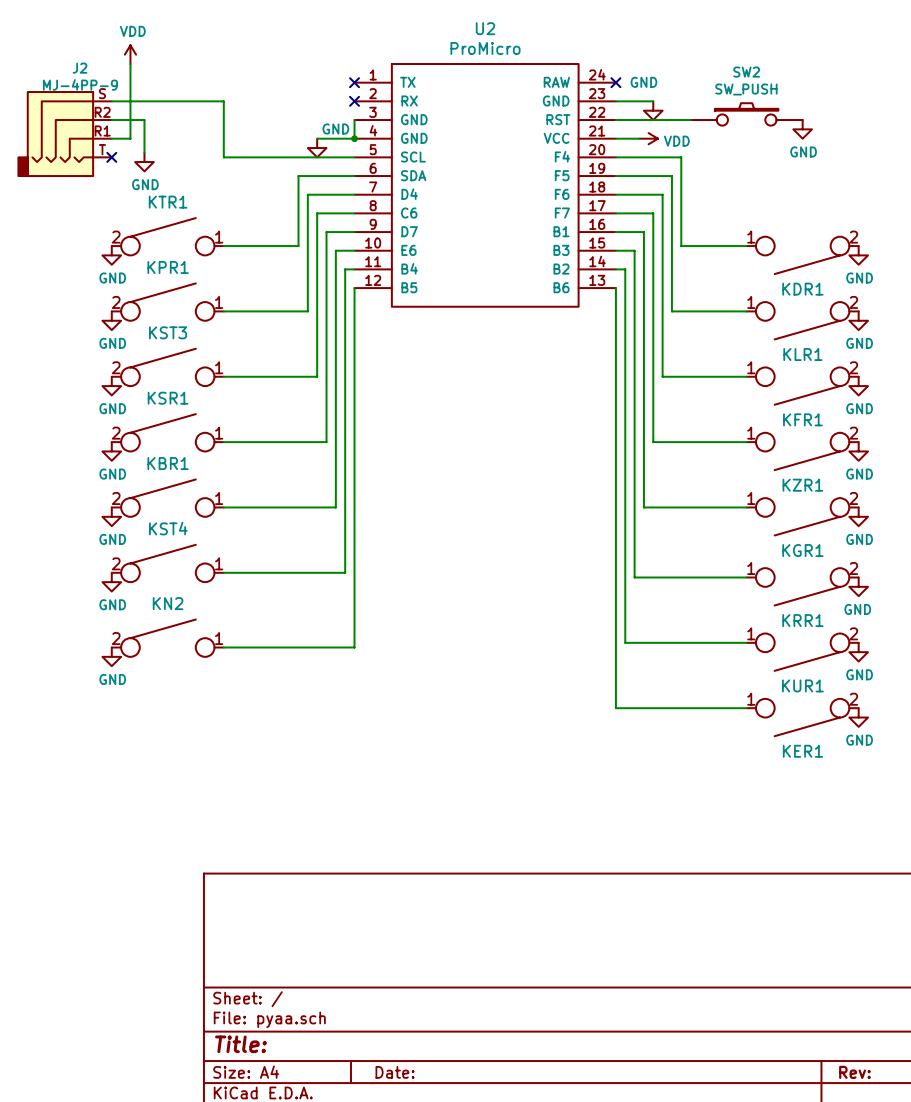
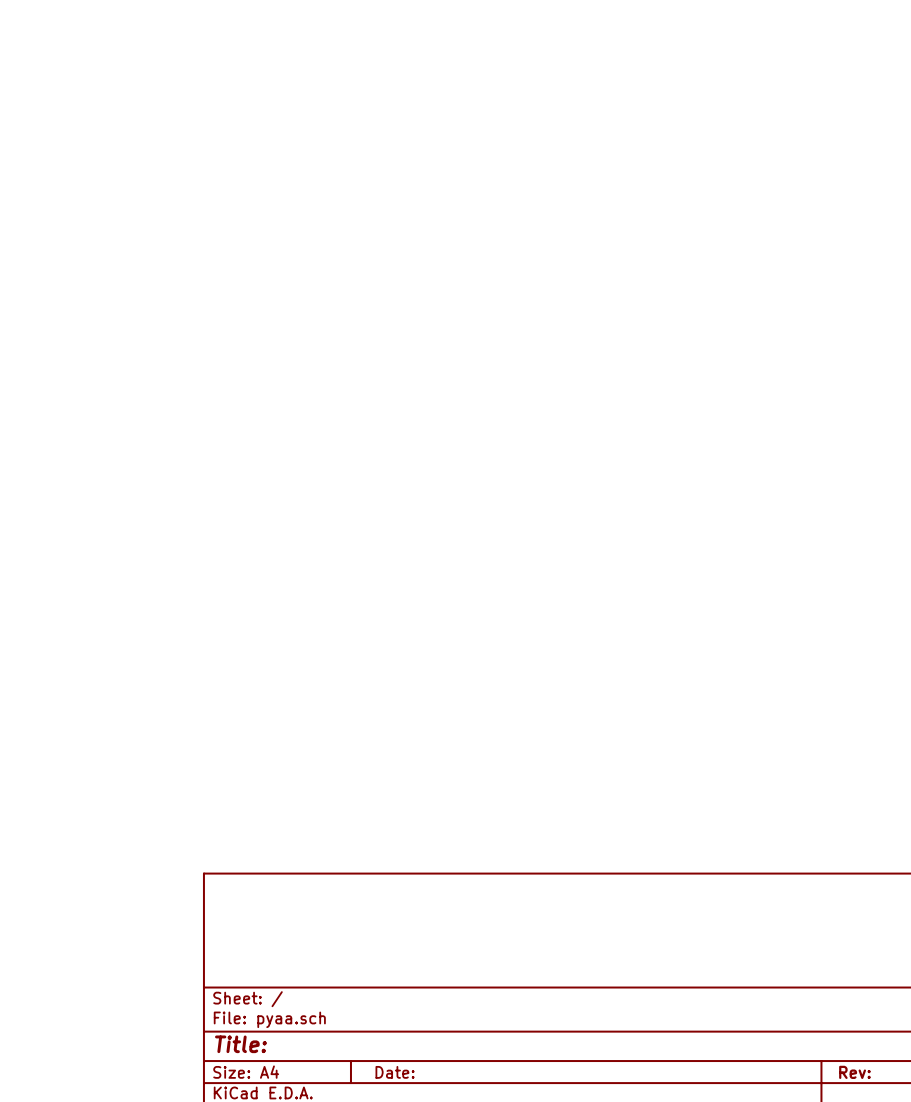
power symbol: VDD (130, 54) -> none
wire: (130, 64) (130, 138) (111, 138) -> none
no-connect mark: (354, 82) -> none
no-connect mark: (615, 82) -> none
wire: (111, 101) (223, 101) (223, 157) (354, 157) -> none
no-connect mark: (354, 101) -> none
wire: (615, 101) (653, 101) -> none
power symbol: GND (653, 110) -> none
SW2: SW_PUSH (746, 114) -> none
wire: (111, 120) (144, 120) (144, 152) -> none
wire: (354, 120) (354, 138) (317, 138) -> none
wire: (615, 120) (690, 120) -> none
power symbol: GND (802, 129) -> none
J2: MJ-4PP-9 (64, 134) -> none
junction: (354, 138) -> none
wire: (615, 138) (639, 138) -> none
power symbol: VDD (648, 138) -> none
power symbol: GND (317, 148) -> none
no-connect mark: (111, 157) -> none
wire: (615, 157) (681, 157) (681, 246) (746, 246) -> none
power symbol: GND (144, 162) -> none
wire: (354, 176) (298, 176) (298, 246) (223, 246) -> none
wire: (615, 176) (671, 176) (671, 311) (746, 311) -> none
U2: ProMicro (485, 185) -> none
wire: (354, 194) (307, 194) (307, 311) (223, 311) -> none
wire: (615, 194) (662, 194) (662, 376) (746, 376) -> none
wire: (354, 213) (317, 213) (317, 376) (223, 376) -> none
wire: (615, 213) (653, 213) (653, 442) (746, 442) -> none
wire: (354, 232) (326, 232) (326, 442) (223, 442) -> none
wire: (615, 232) (643, 232) (643, 507) (746, 507) -> none
KTR1: (167, 236) -> none
wire: (354, 250) (335, 250) (335, 507) (223, 507) -> none
wire: (615, 250) (634, 250) (634, 577) (746, 577) -> none
power symbol: GND (111, 255) -> none
KDR1: (802, 255) -> none
power symbol: GND (858, 255) -> none
wire: (354, 269) (345, 269) (345, 572) (223, 572) -> none
wire: (615, 269) (625, 269) (625, 642) (746, 642) -> none
wire: (354, 288) (354, 647) (223, 647) -> none
wire: (615, 288) (615, 708) (746, 708) -> none
KPR1: (167, 301) -> none
power symbol: GND (111, 320) -> none
power symbol: GND (858, 320) -> none
KLR1: (802, 321) -> none
KST3: (167, 366) -> none
power symbol: GND (111, 386) -> none
KFR1: (802, 386) -> none
power symbol: GND (858, 386) -> none
KSR1: (167, 432) -> none
power symbol: GND (111, 451) -> none
KZR1: (802, 451) -> none
power symbol: GND (858, 451) -> none
KBR1: (167, 497) -> none
power symbol: GND (111, 516) -> none
power symbol: GND (858, 516) -> none
KGR1: (802, 517) -> none
KST4: (167, 563) -> none
power symbol: GND (111, 582) -> none
power symbol: GND (858, 586) -> none
KRR1: (802, 587) -> none
KN2: (167, 637) -> none
KUR1: (802, 652) -> none
power symbol: GND (858, 652) -> none
power symbol: GND (111, 656) -> none
KER1: (802, 717) -> none
power symbol: GND (858, 717) -> none

